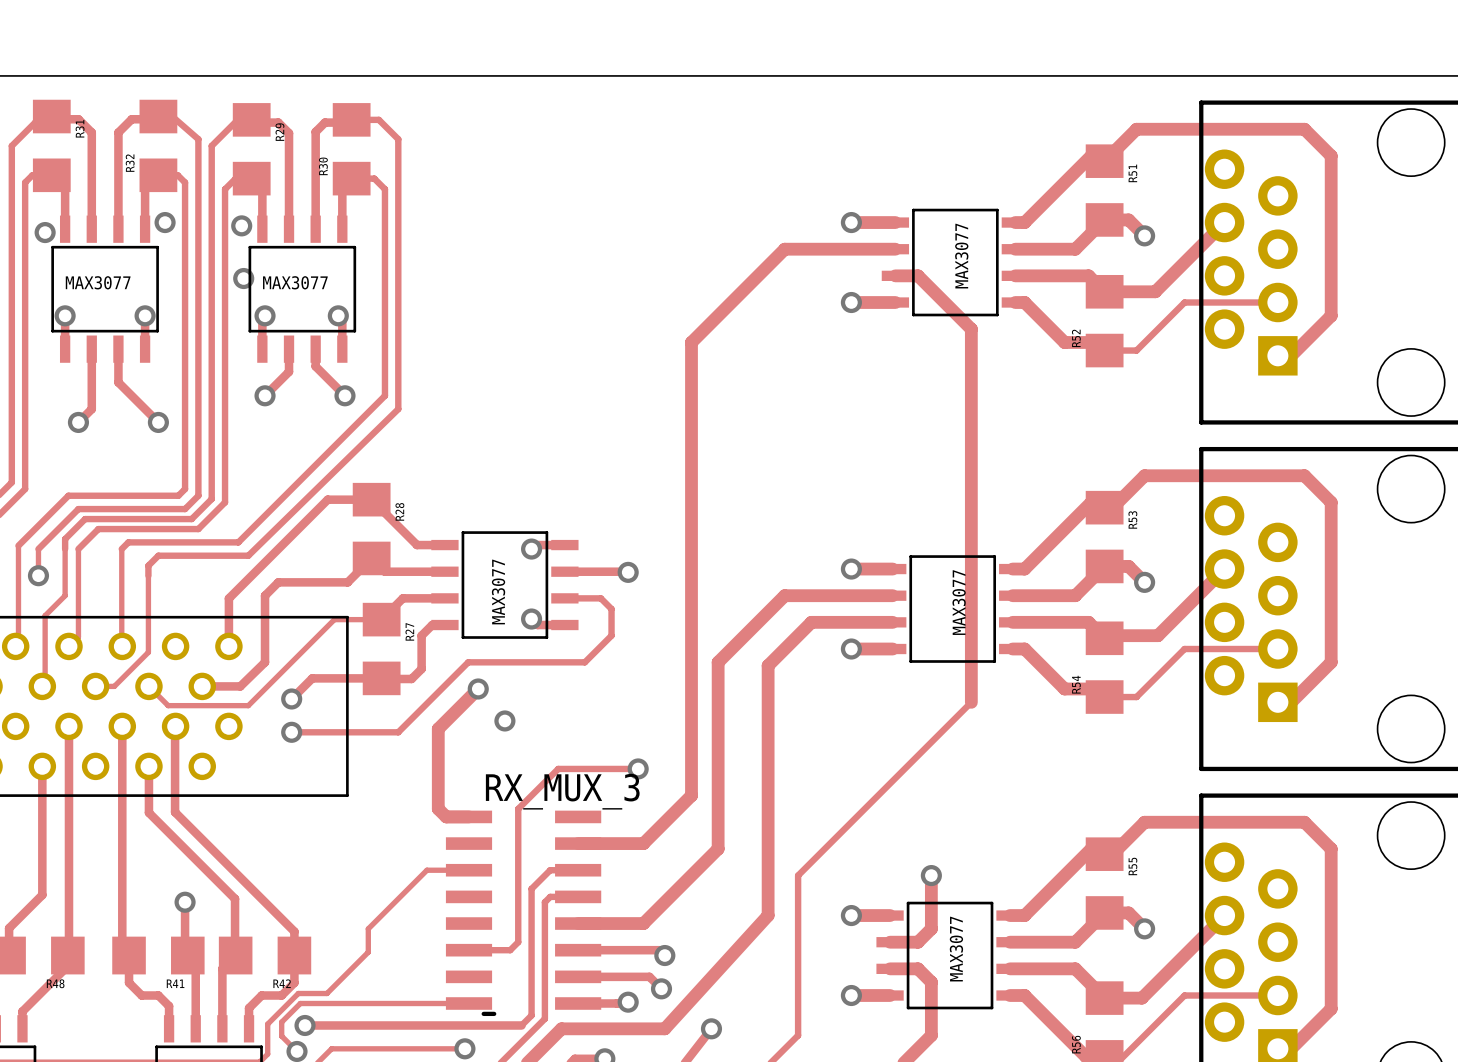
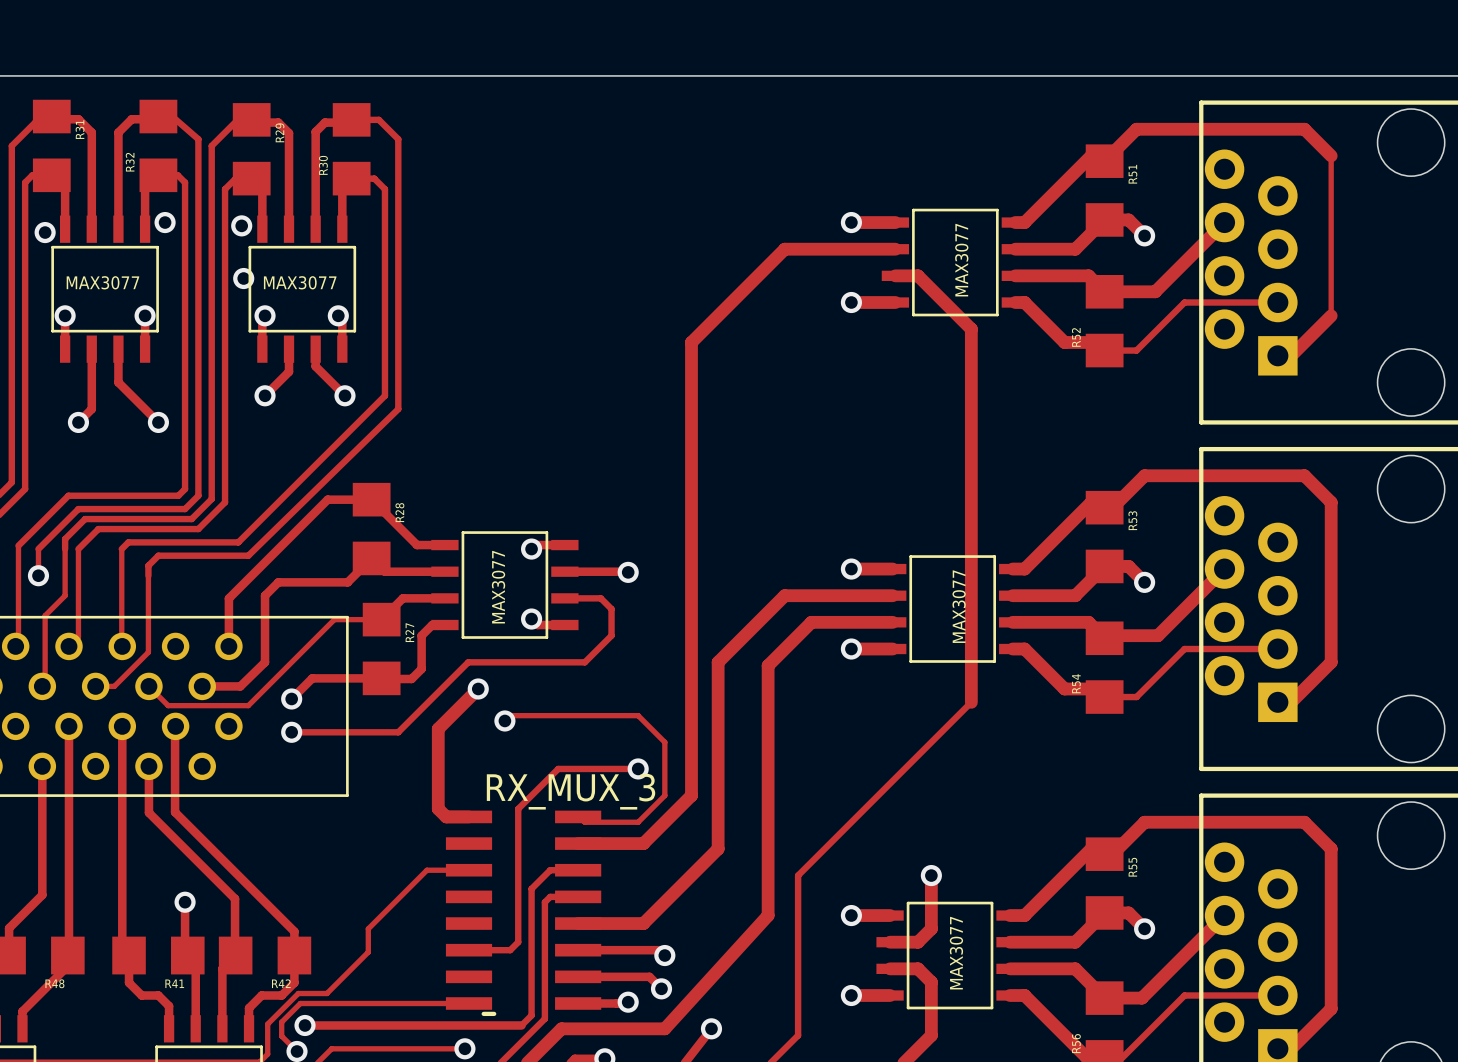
track width: thick (1331, 155) (1331, 315) -> thin (1331, 155) (1331, 315)
track: none -> (504, 720) (504, 715) (638, 715) (664, 742) (664, 795) (638, 822) (584, 822) (578, 816)

